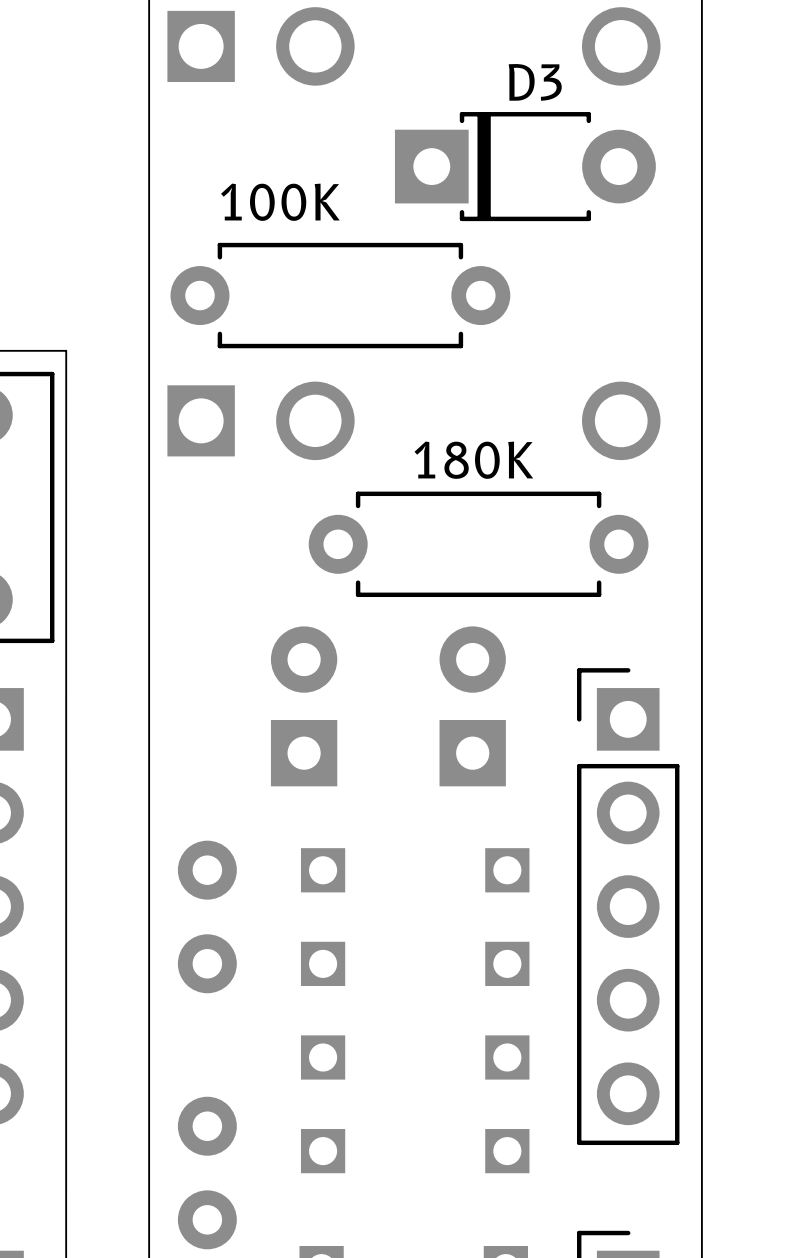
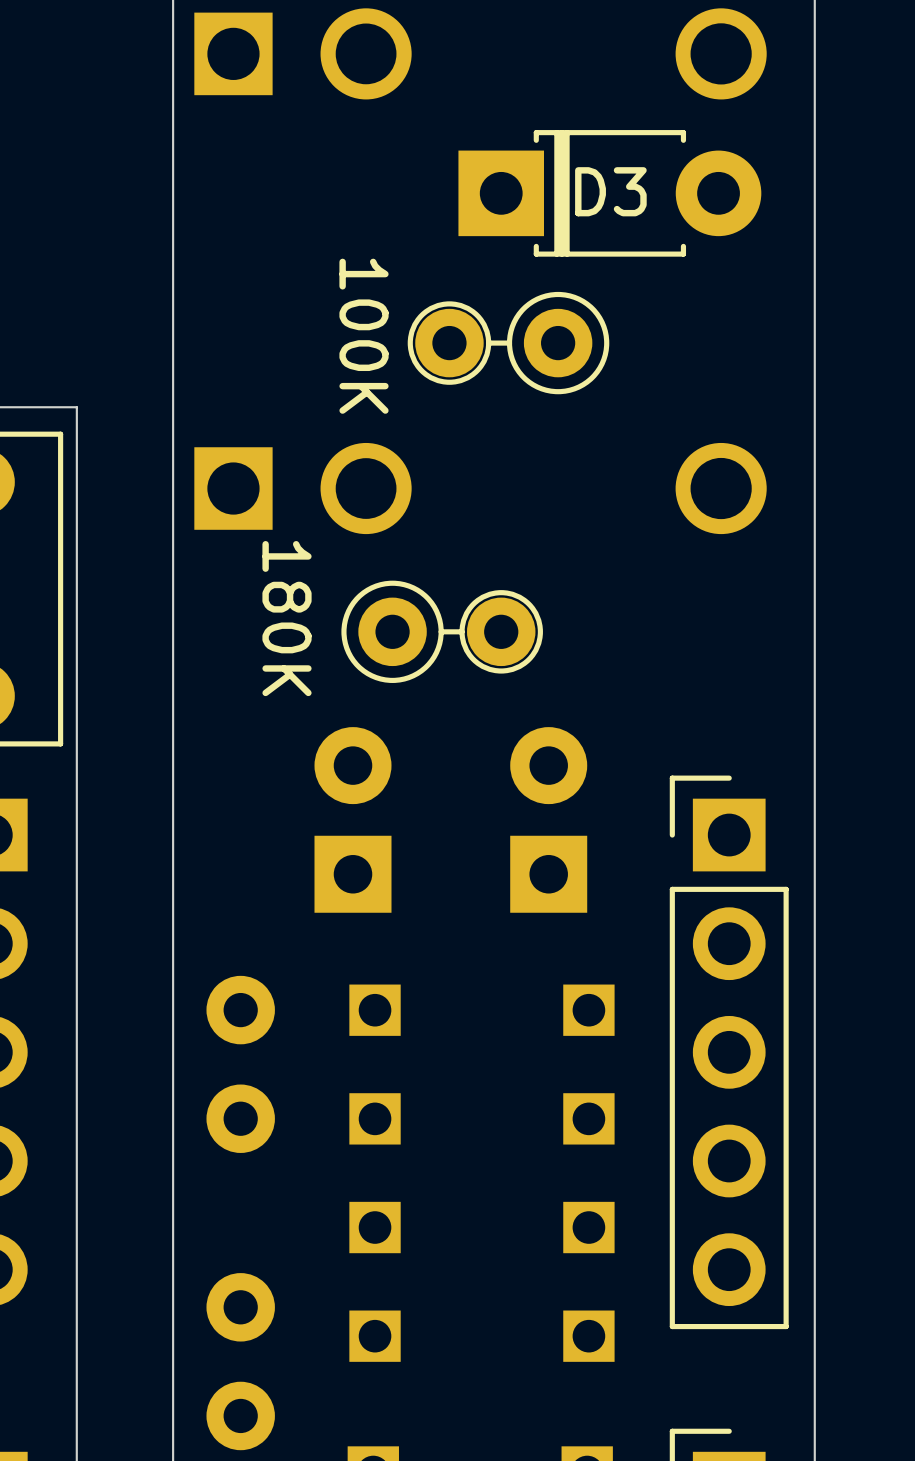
D3 name position: D3 (535, 82) -> D3 (610, 191)
part: 100K (340, 295) -> none
part: none -> 100K (508, 343)
part: none -> 180K (442, 631)
part: 180K (478, 544) -> none

